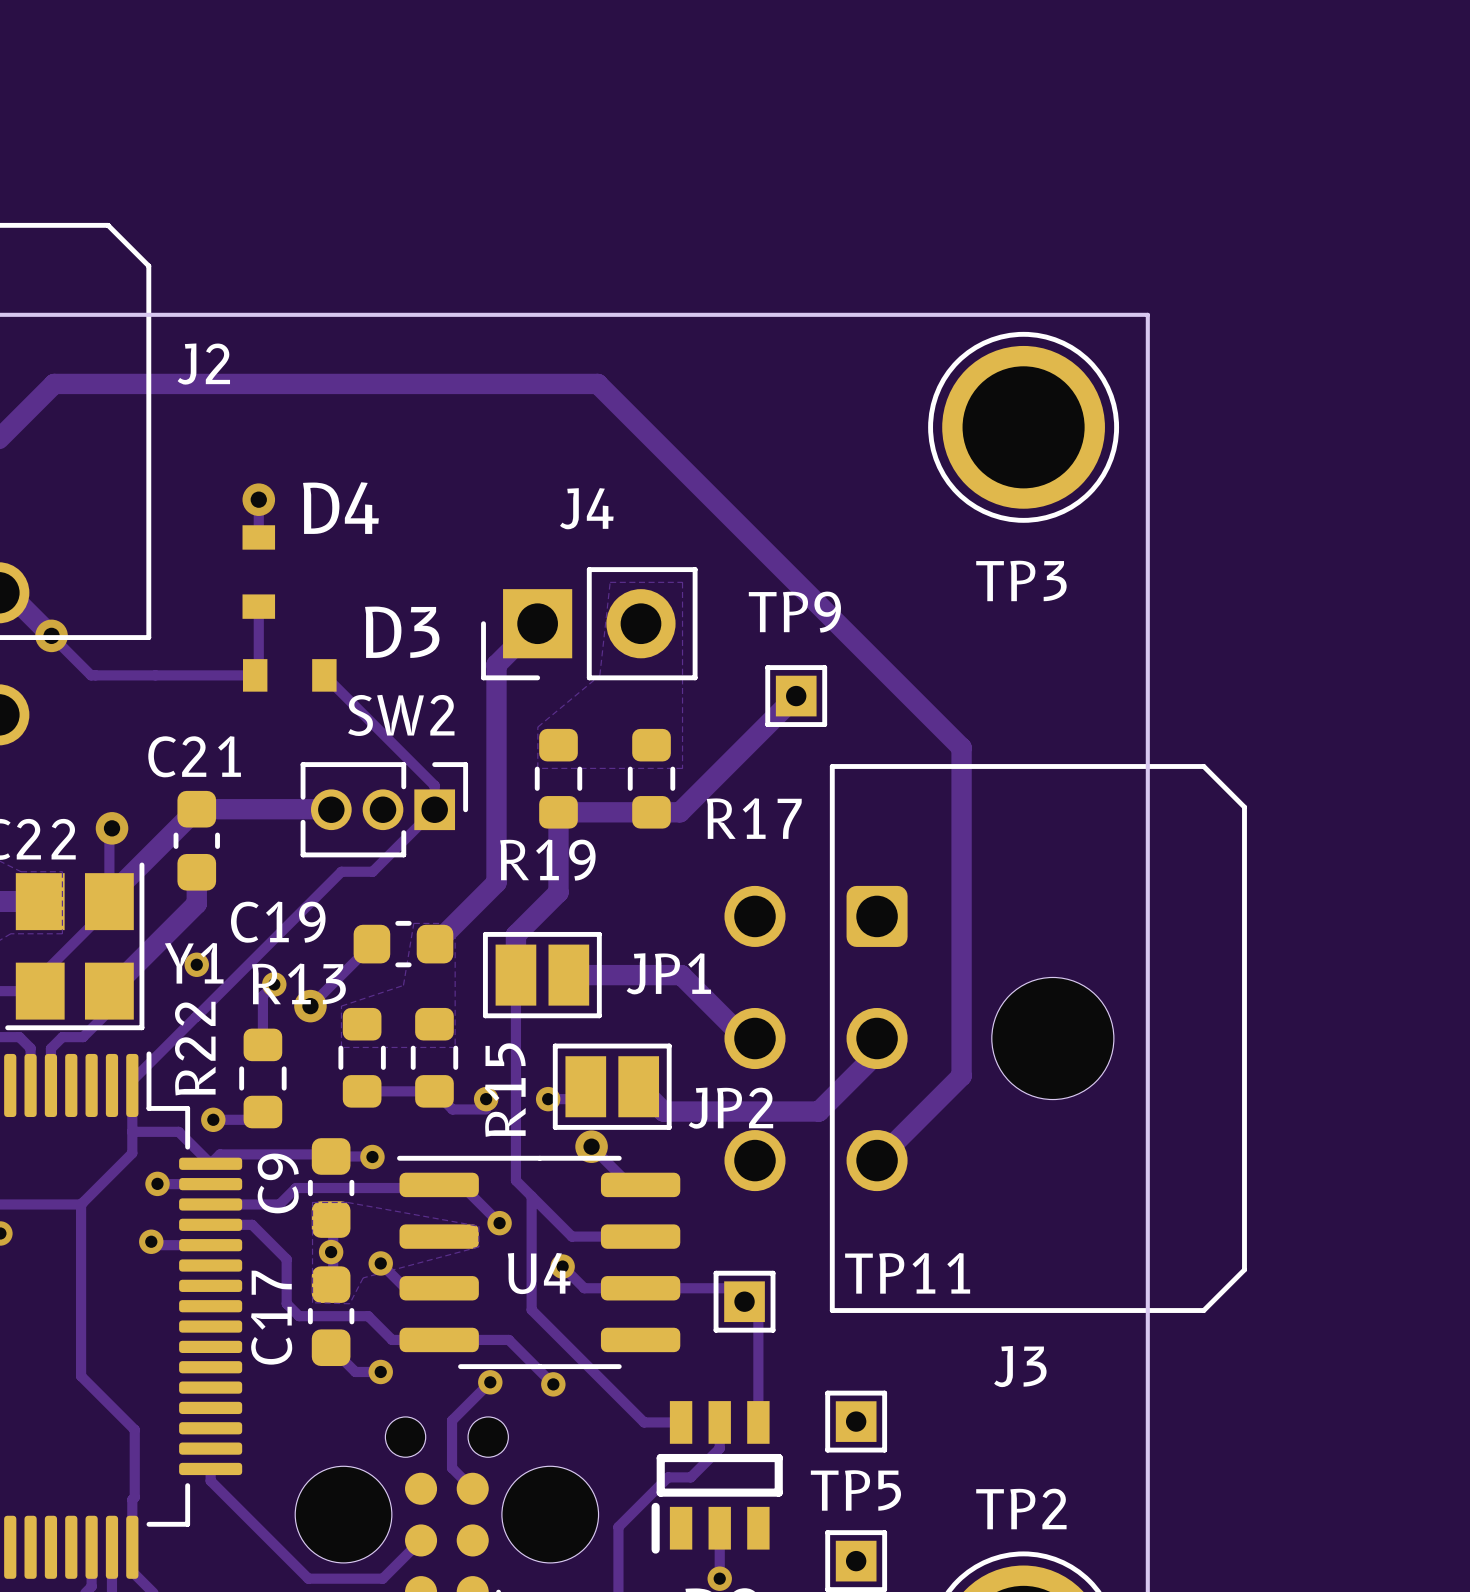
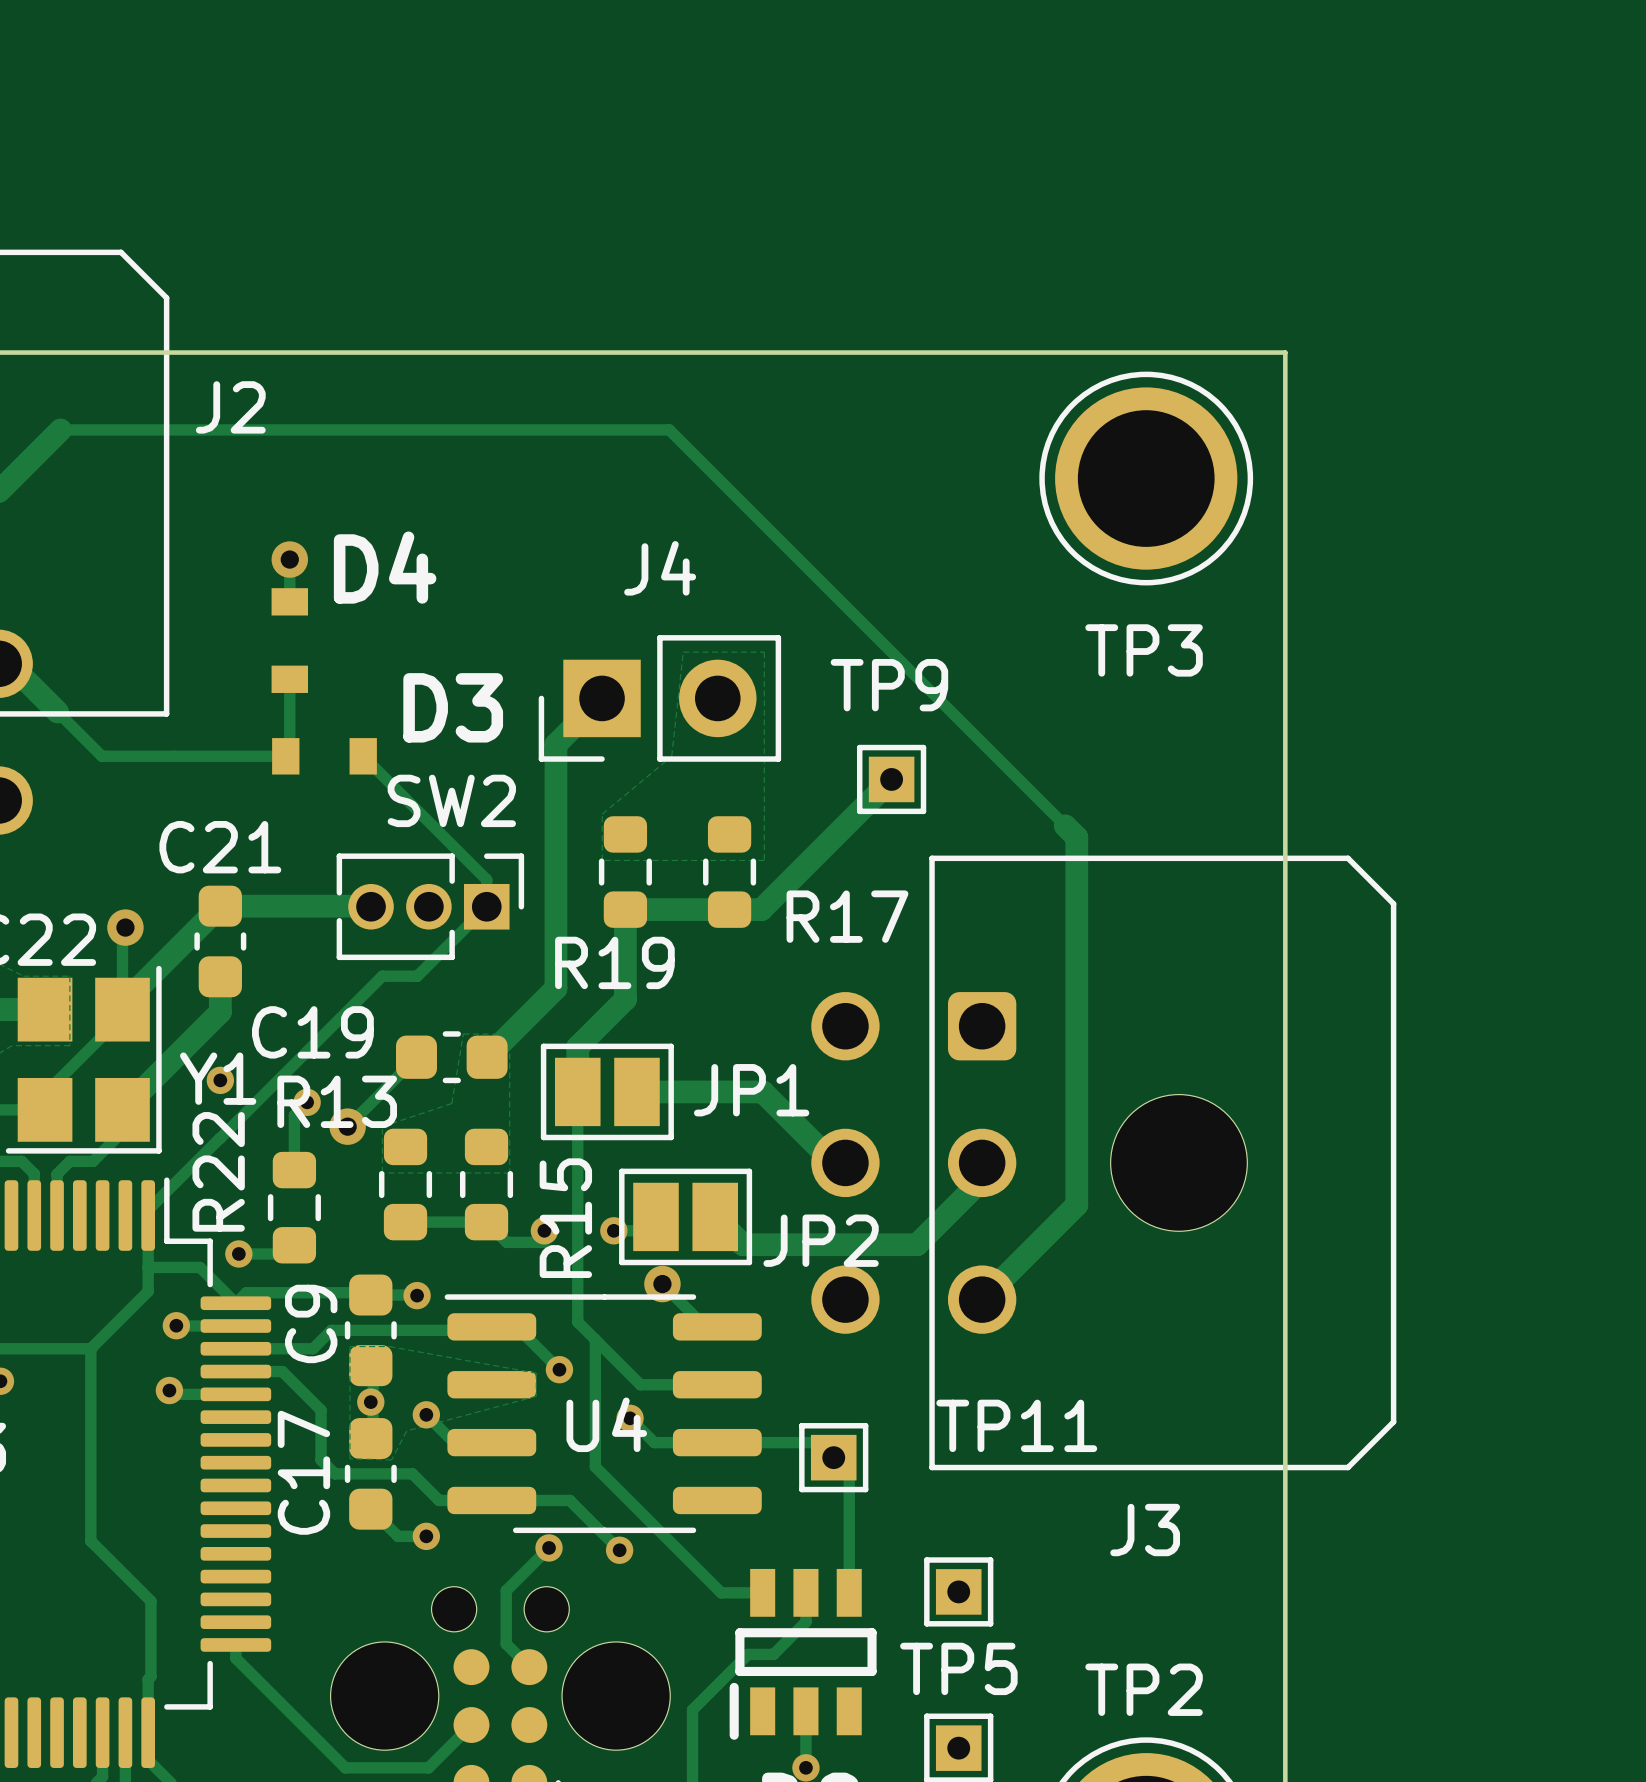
track width: thick (54, 383) (597, 383) (951, 737) -> thin (60, 429) (669, 429) (1065, 825)
via: (51, 635) -> none

